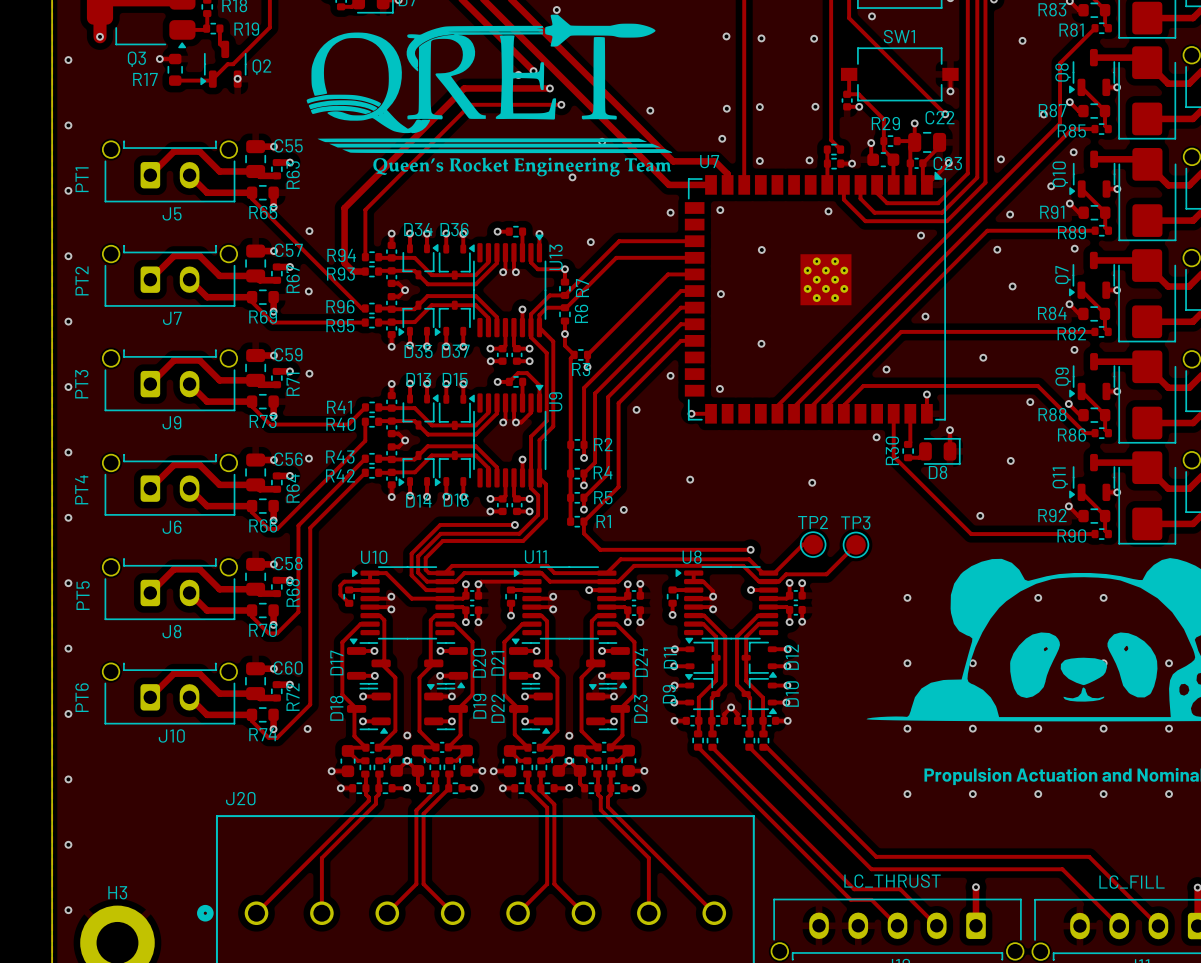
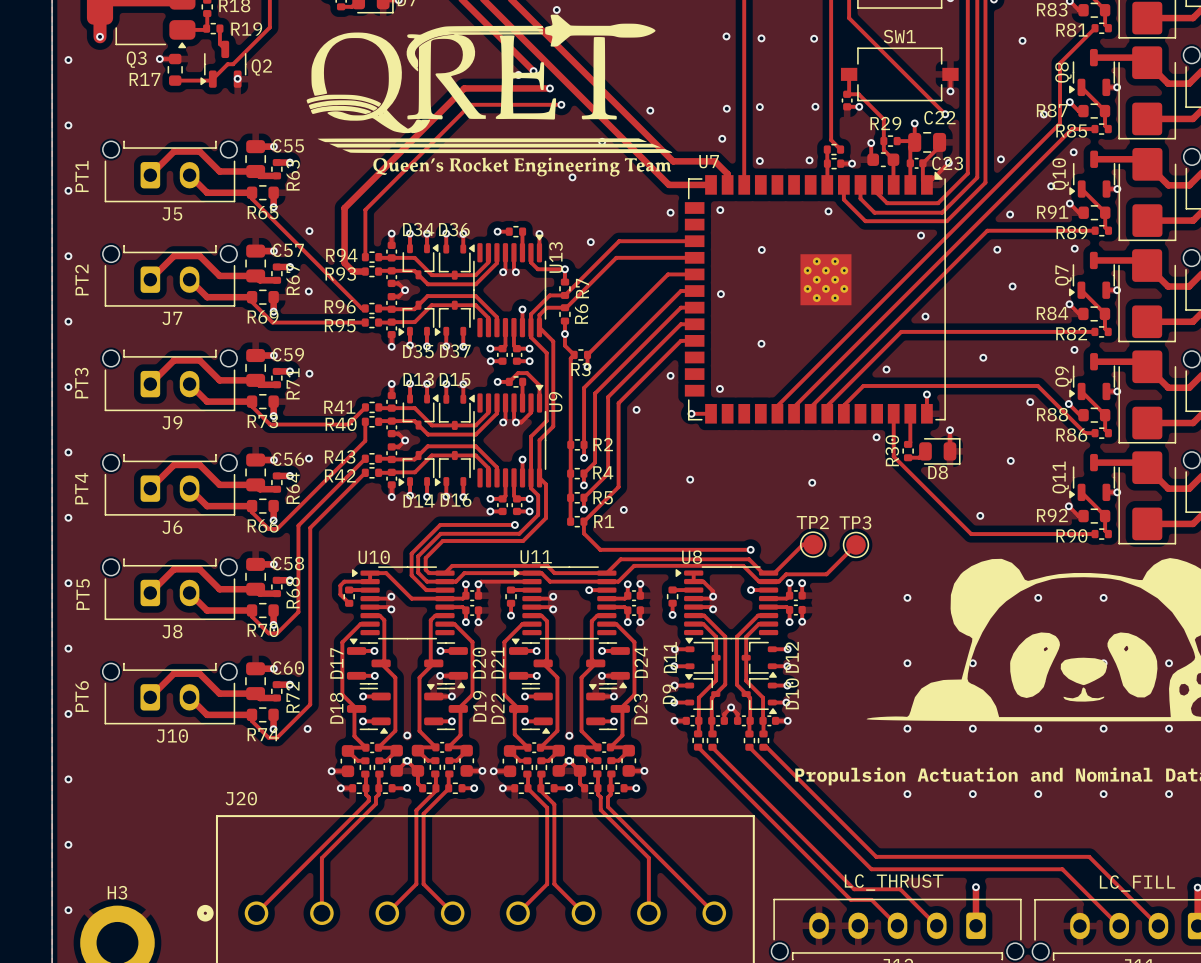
via: (872, 16) -> none

